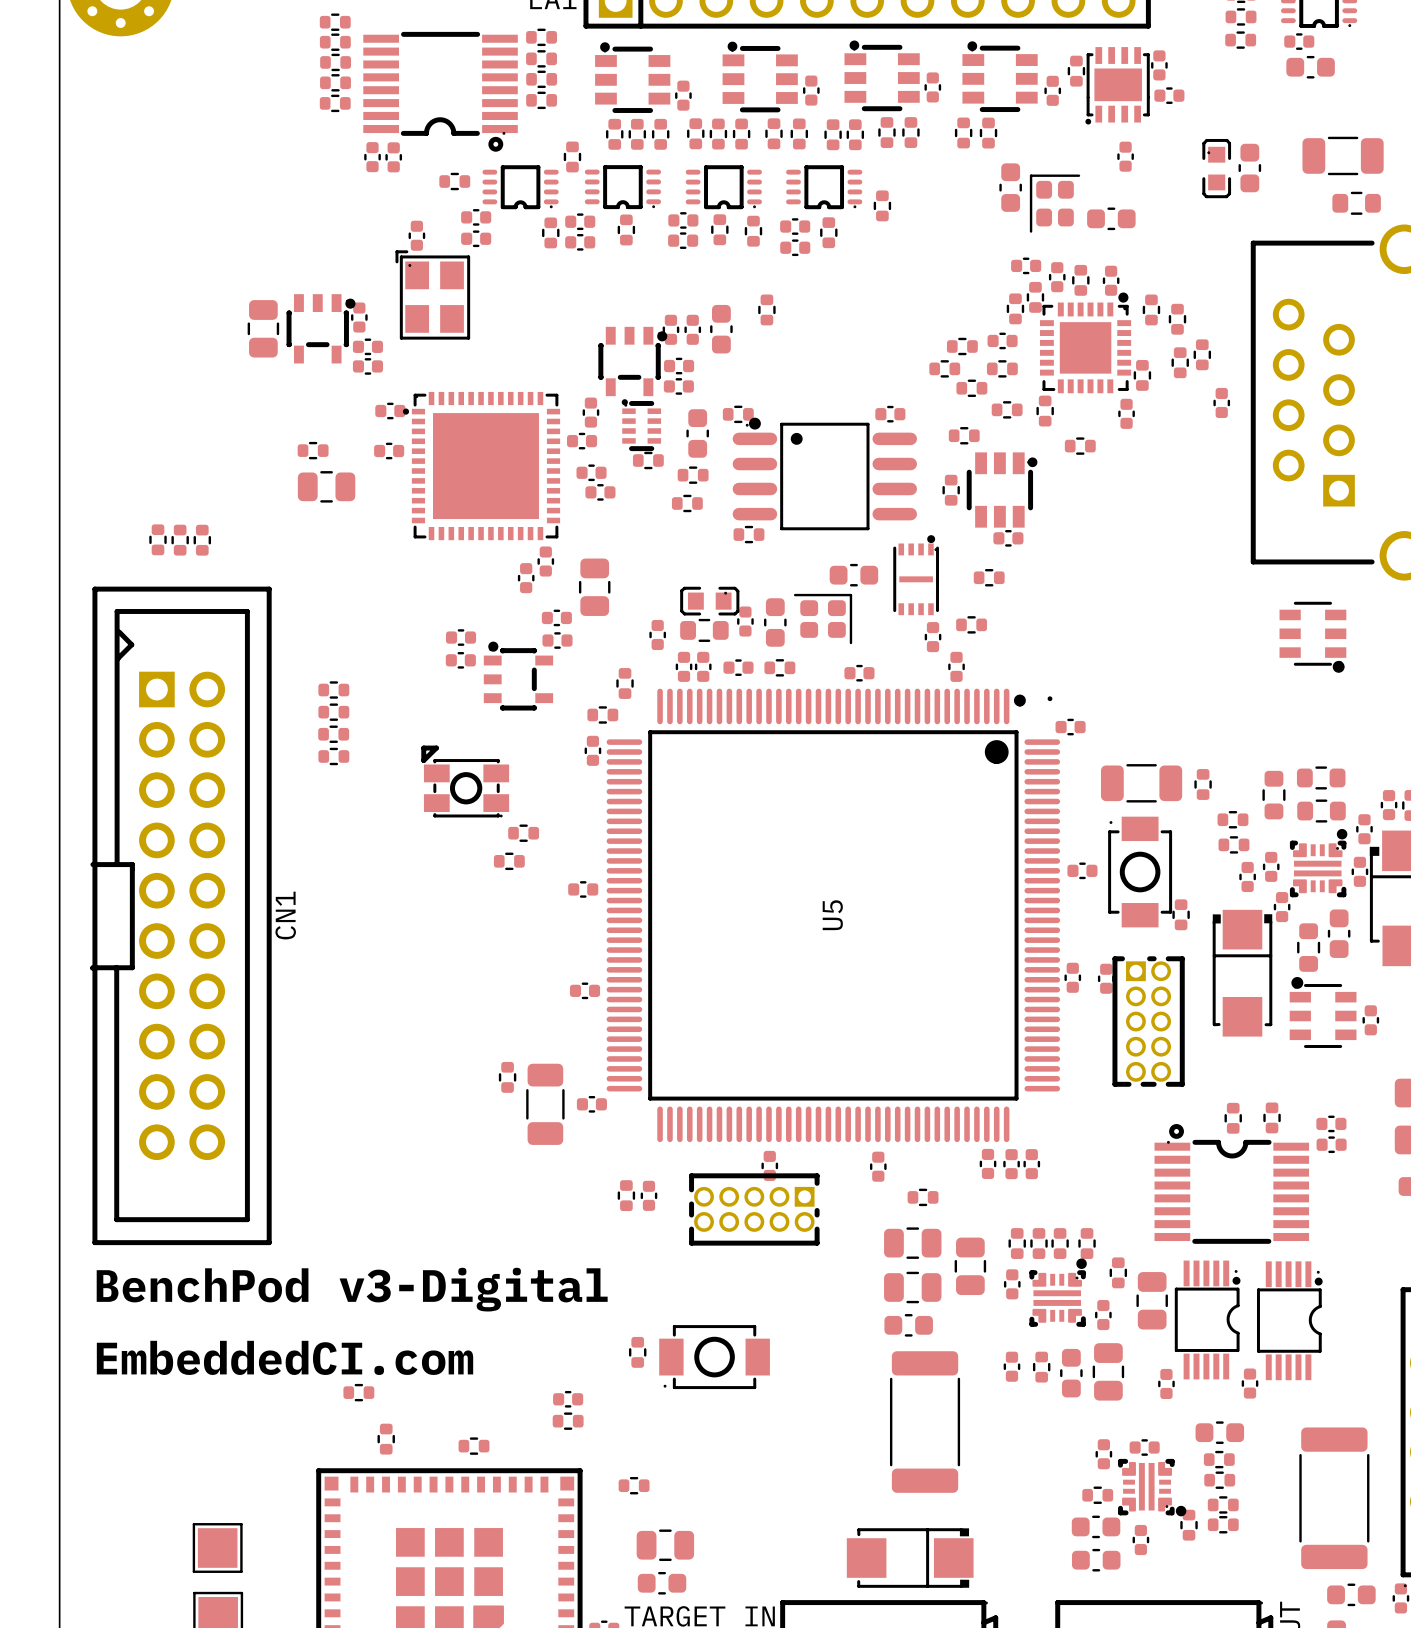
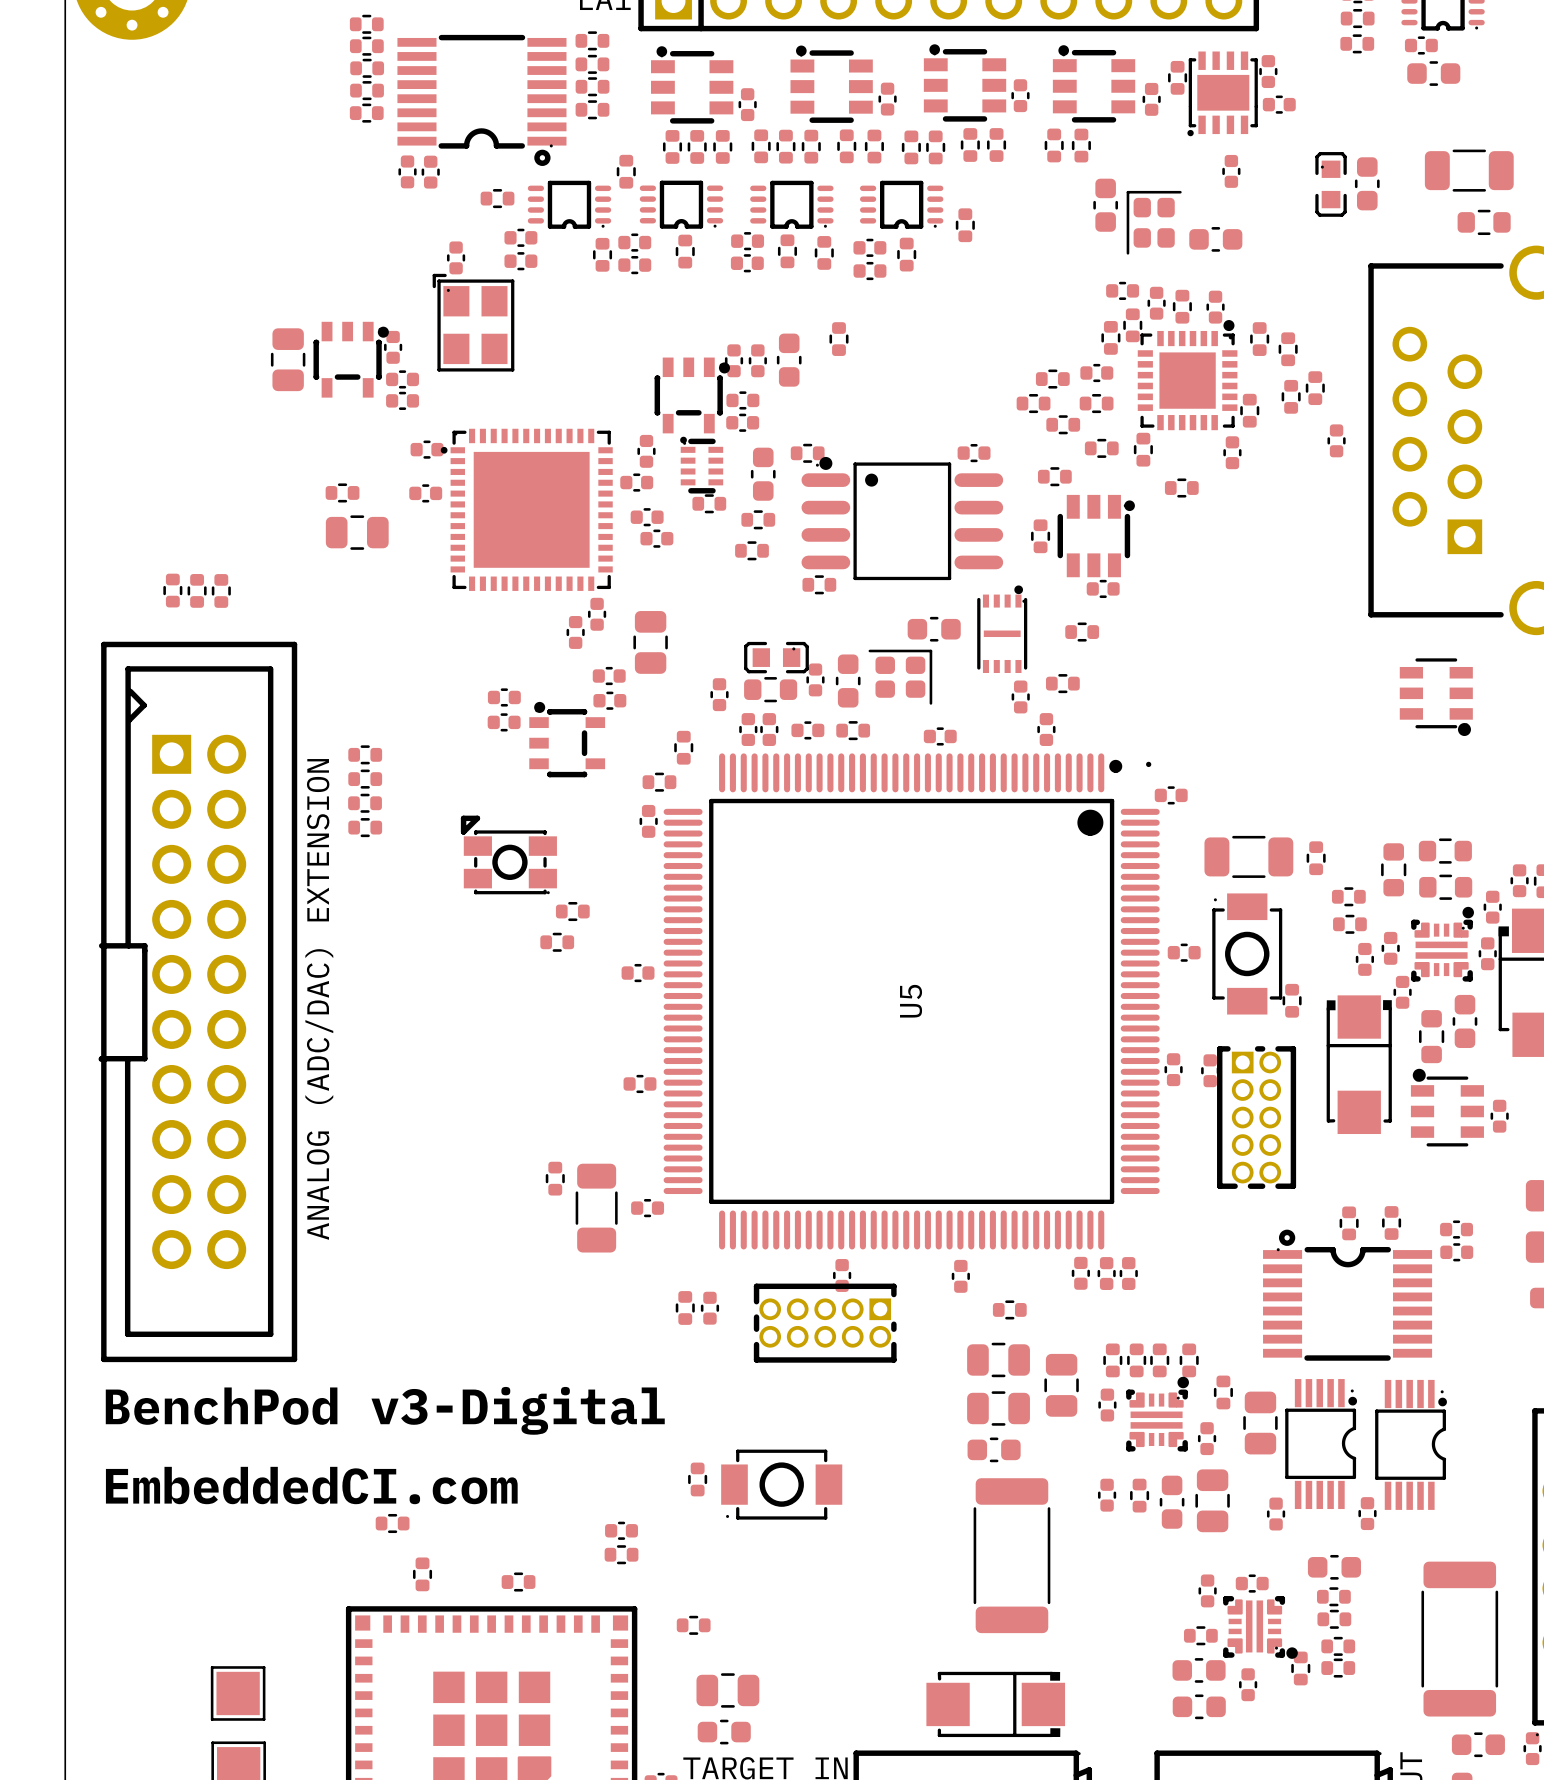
text: none -> ANALOG (ADC/DAC) EXTENSION (319, 999)
CN1 name: CN1 (285, 915) -> none

